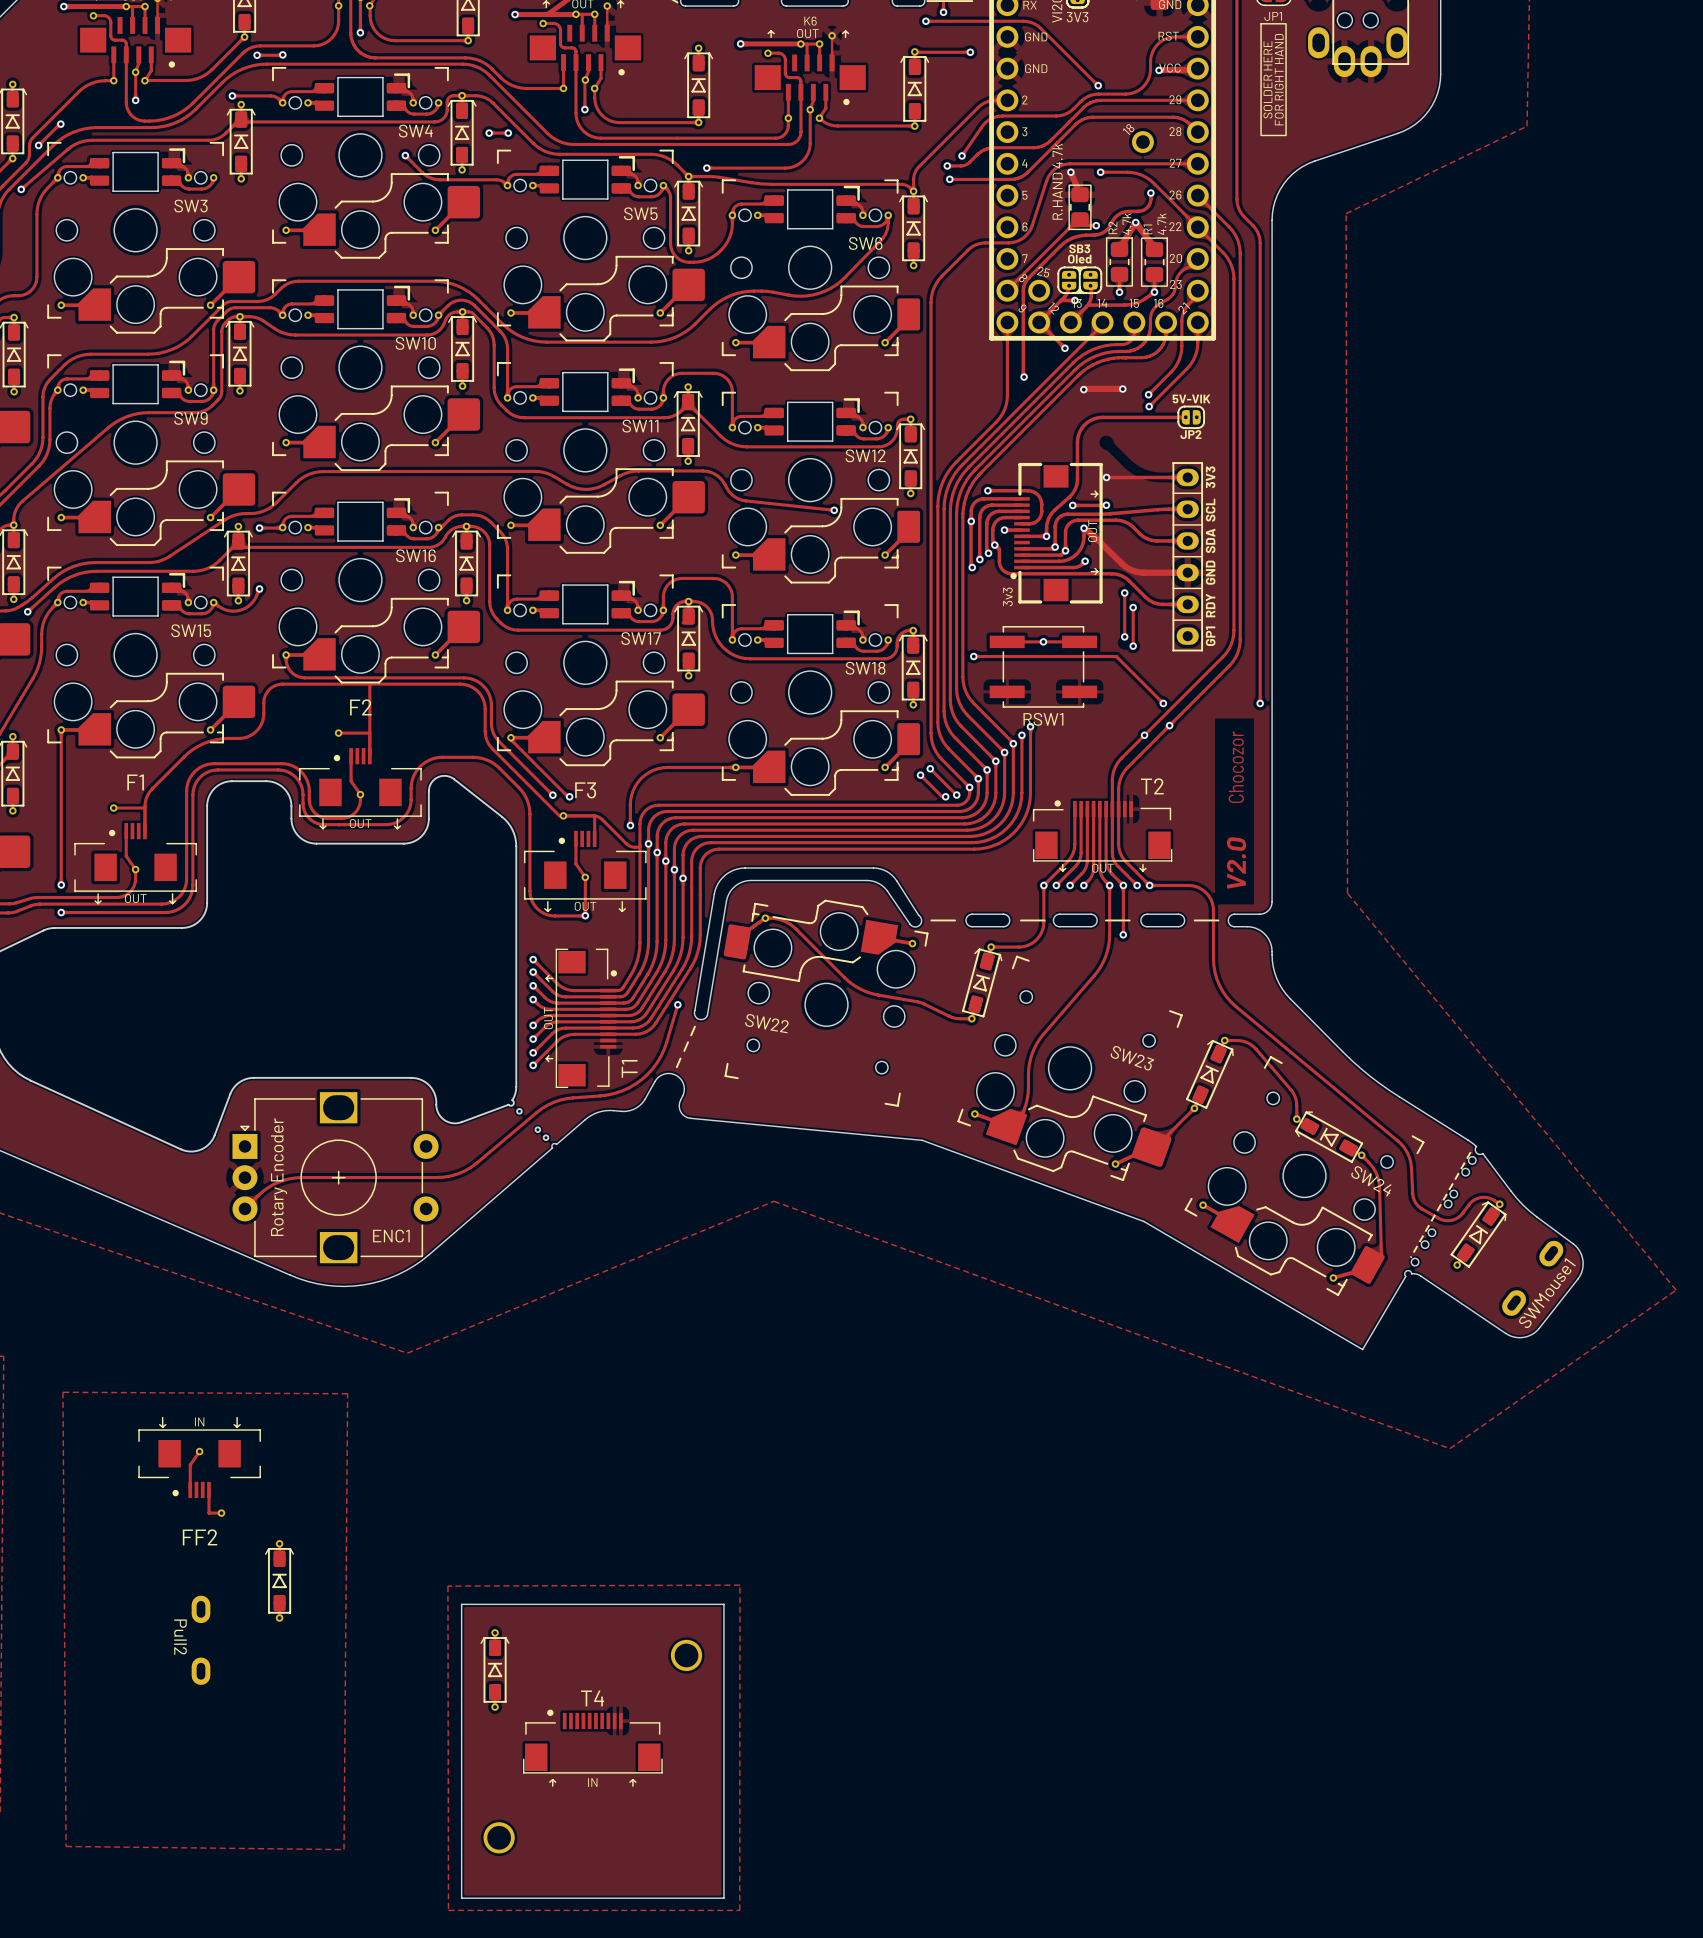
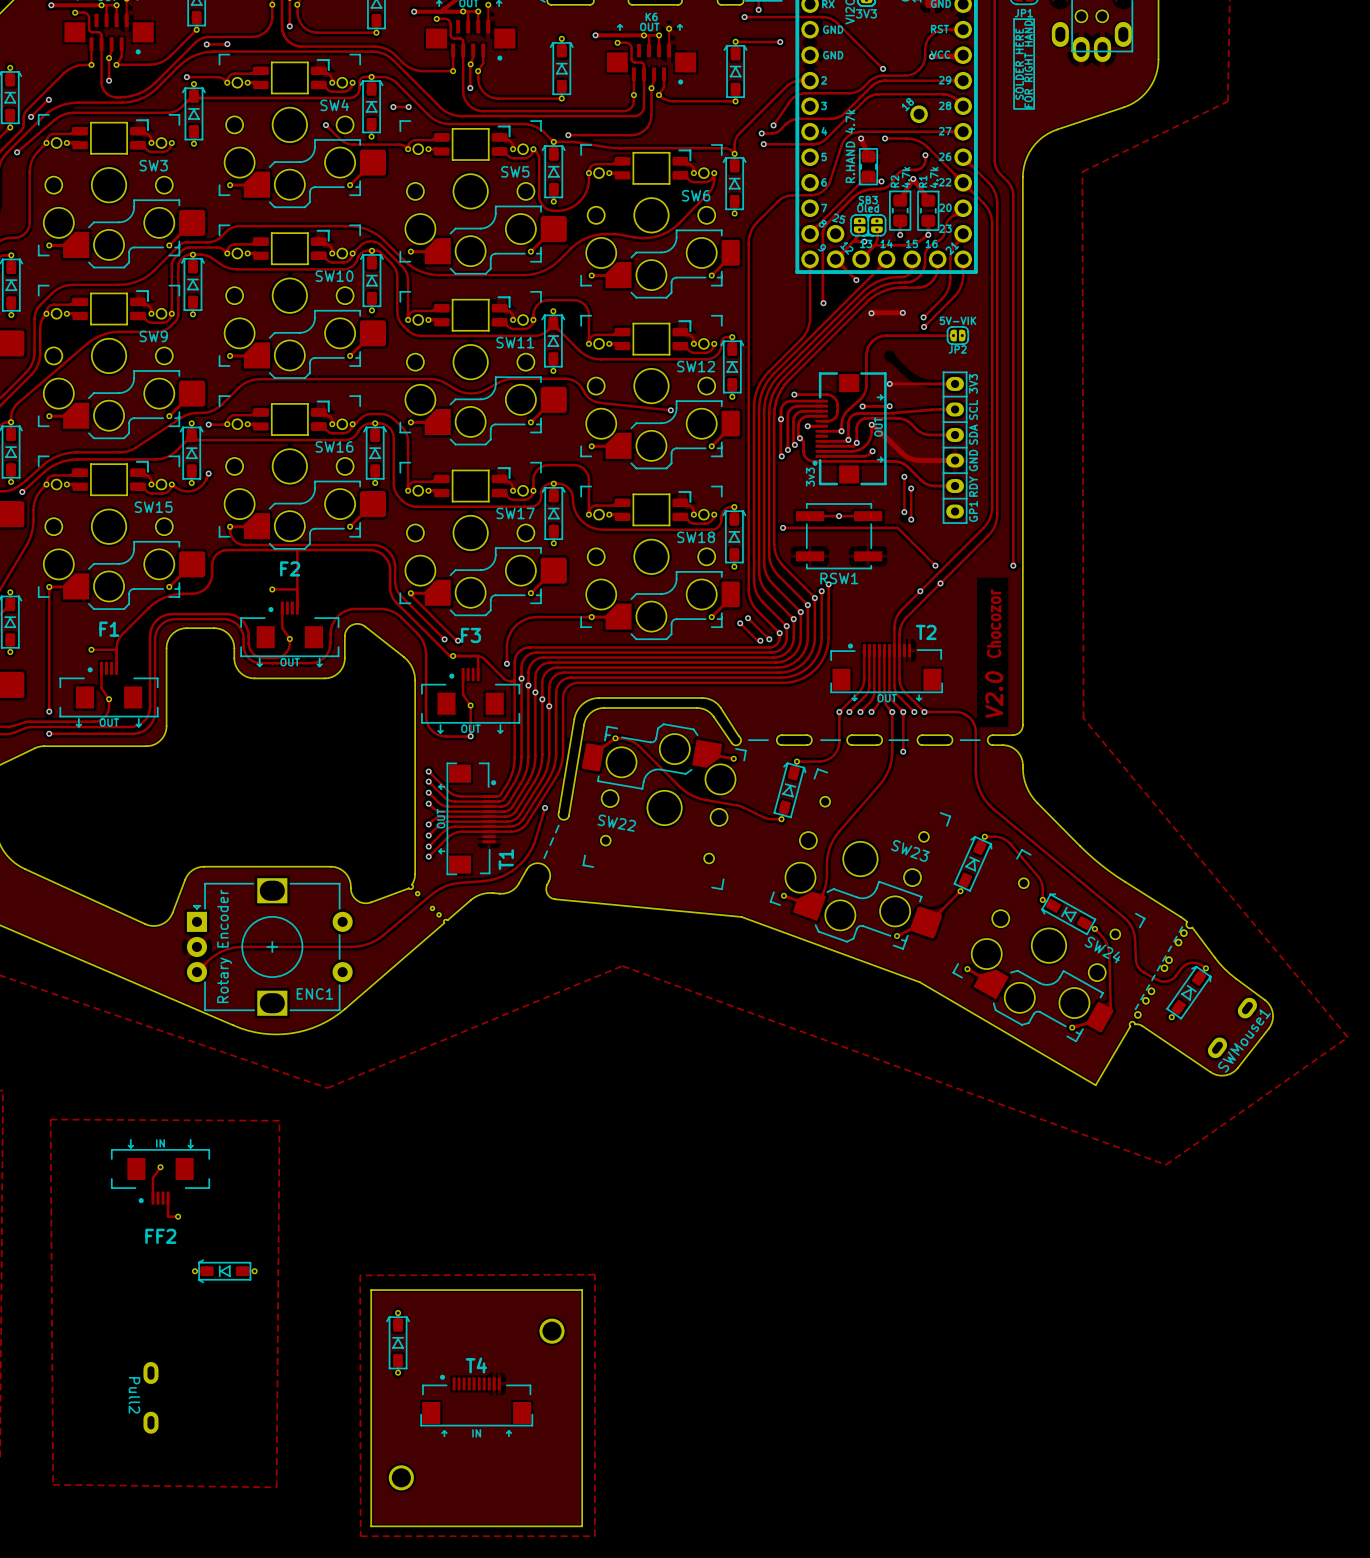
part rotation: 0° (279, 1580) -> 90° counterclockwise (224, 1271)
Pull2 position: (200, 1640) -> (150, 1397)

